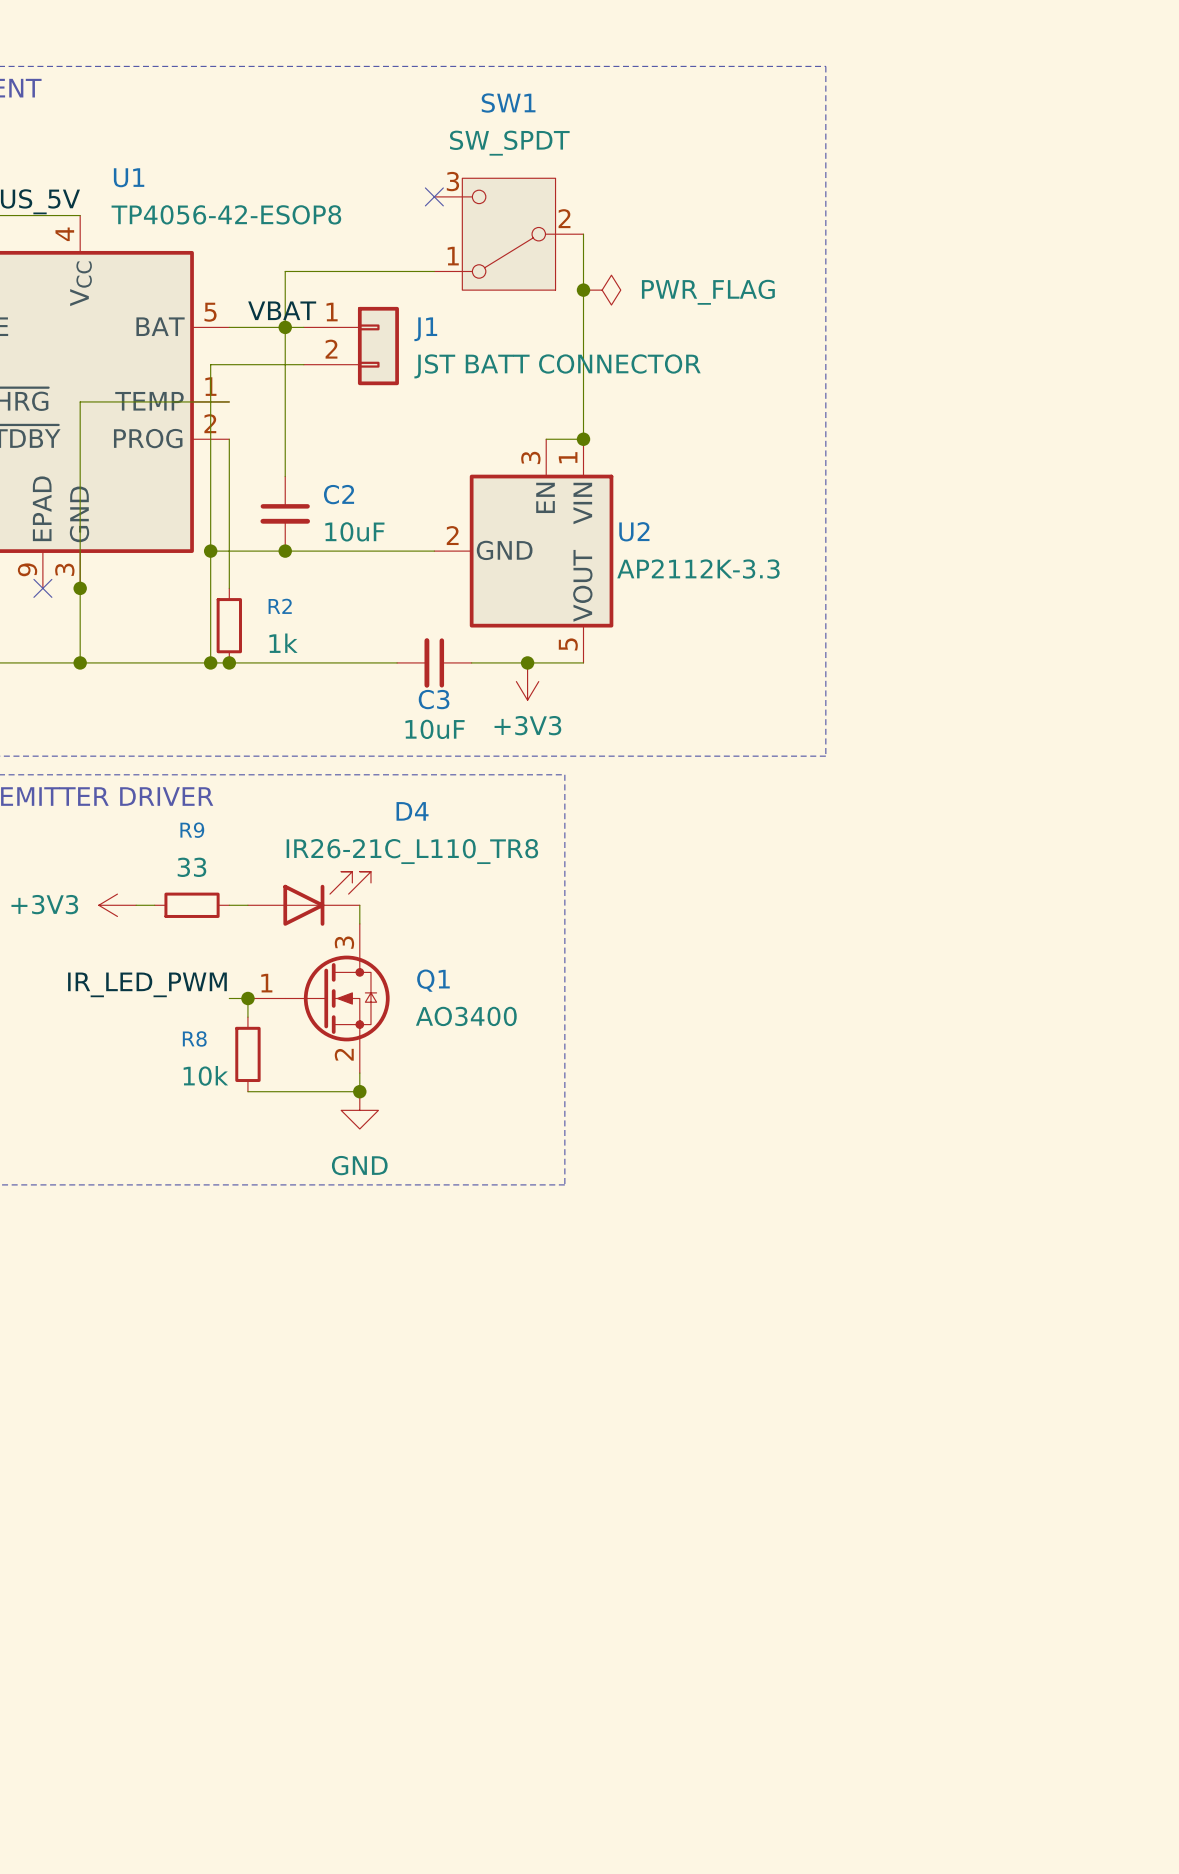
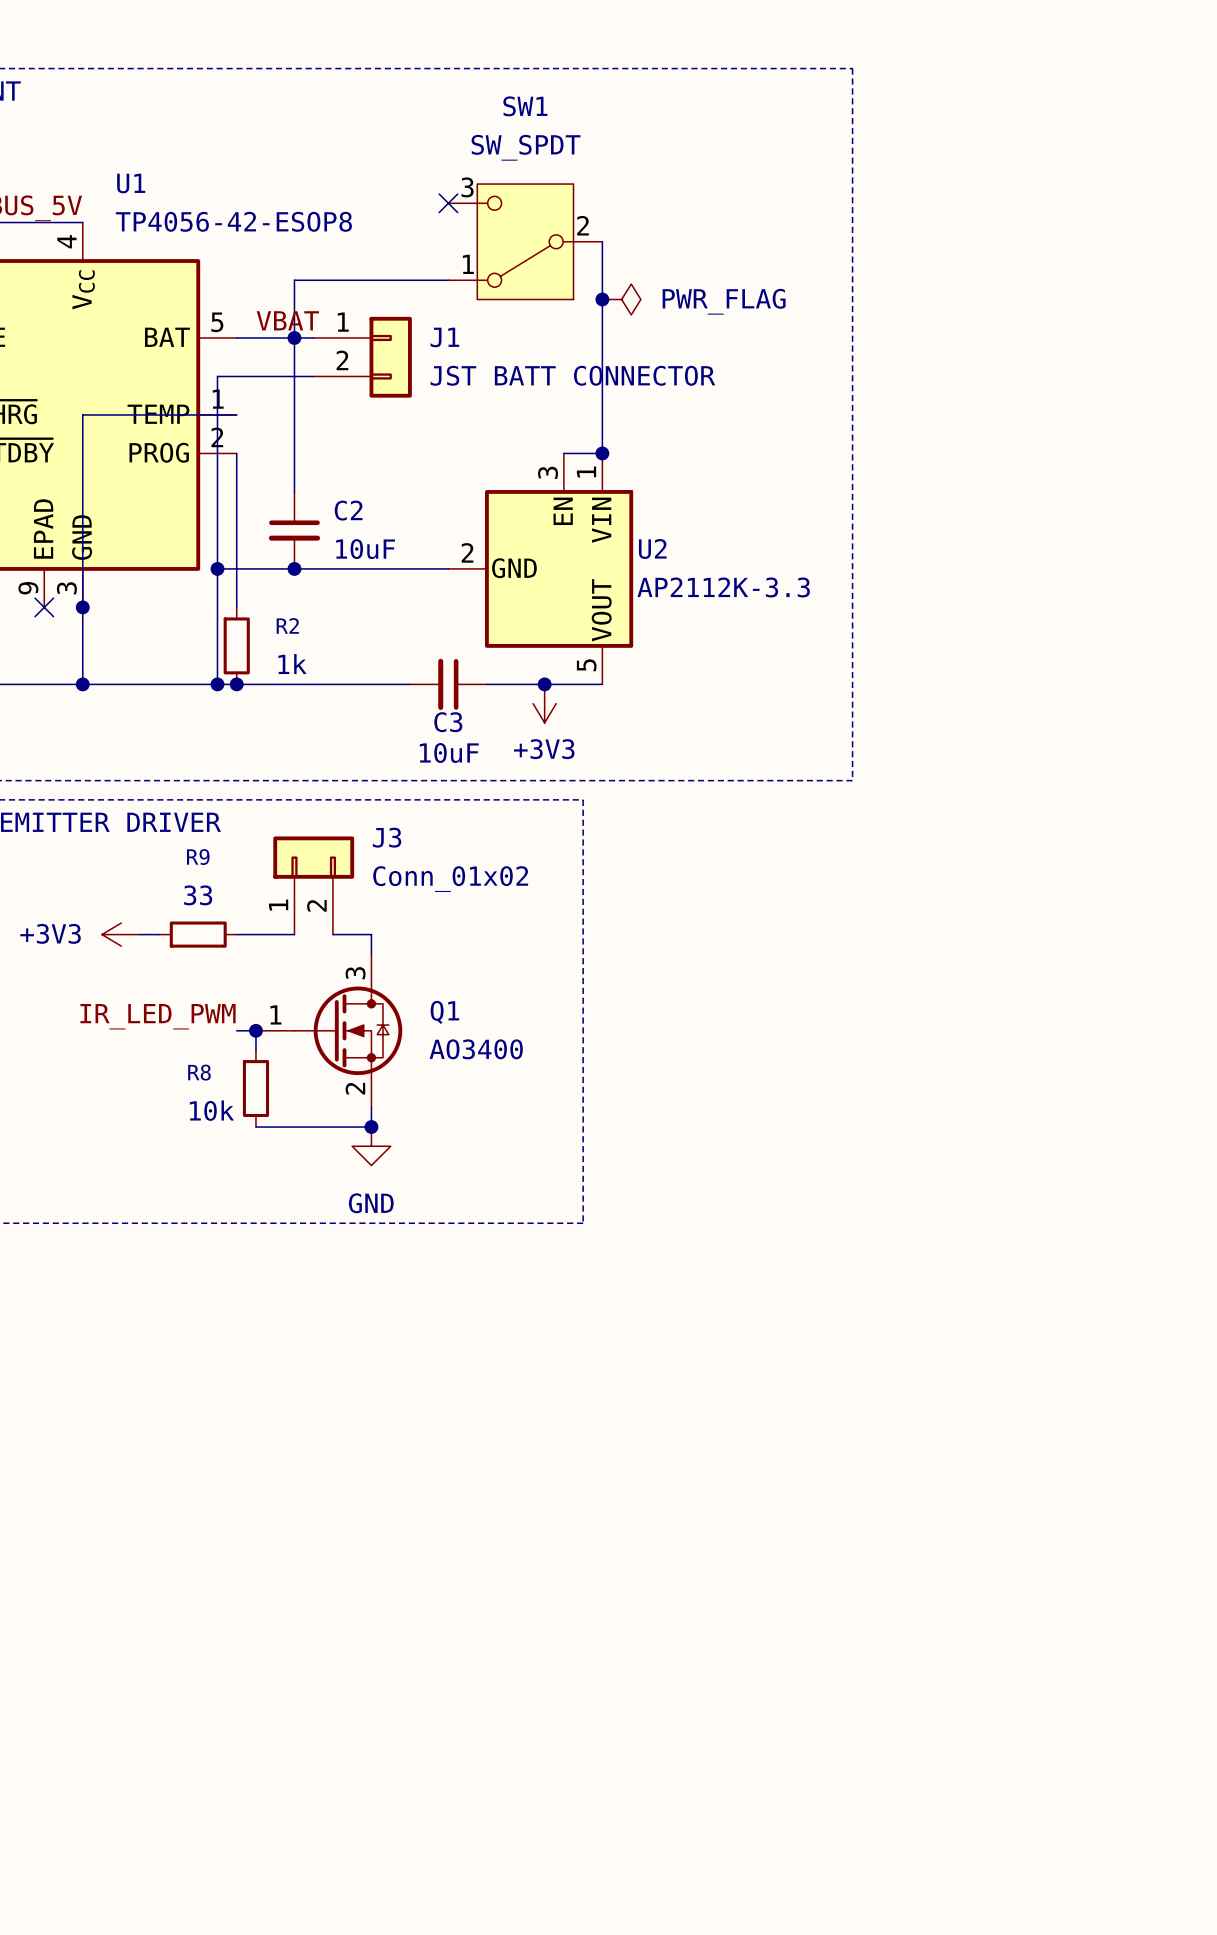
J3: none -> Conn_01x02 (313, 885)
D4: IR26-21C_L110_TR8 (309, 898) -> none

